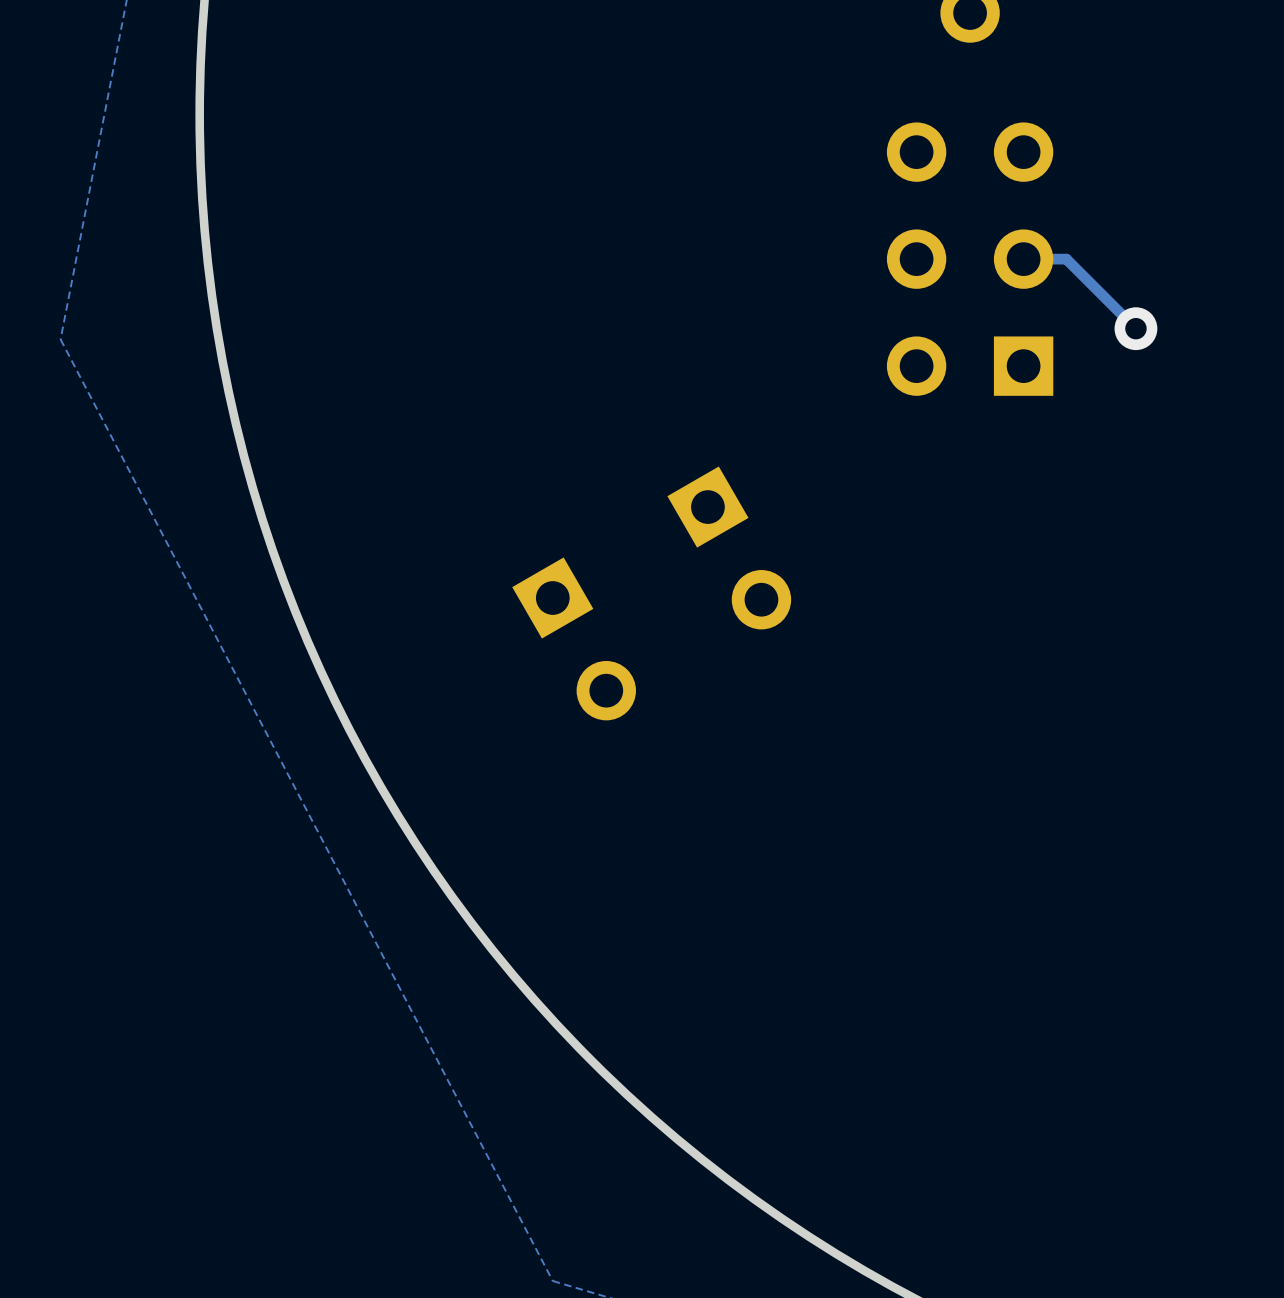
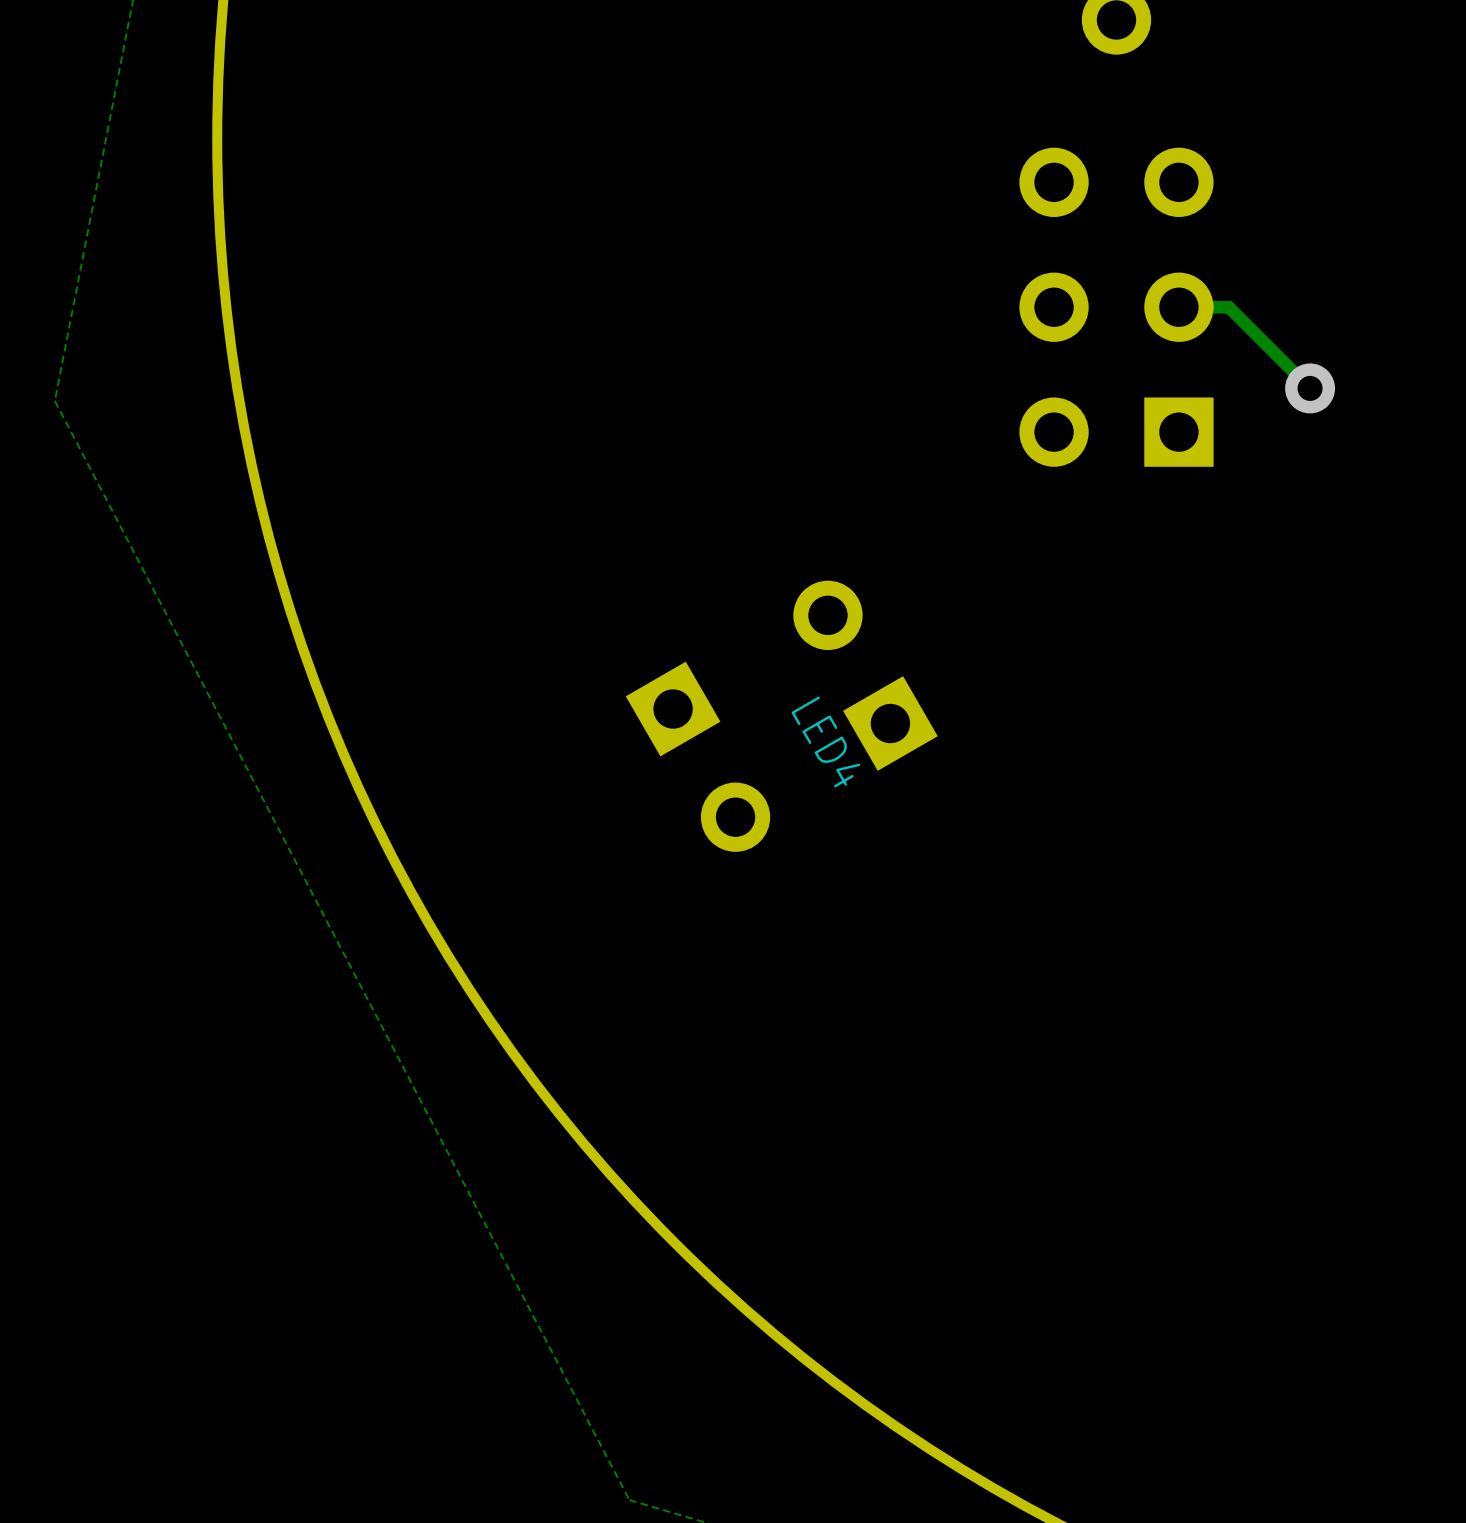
LED4 side: top (729, 547) -> bottom (865, 675)
part position: (574, 638) -> (697, 756)

